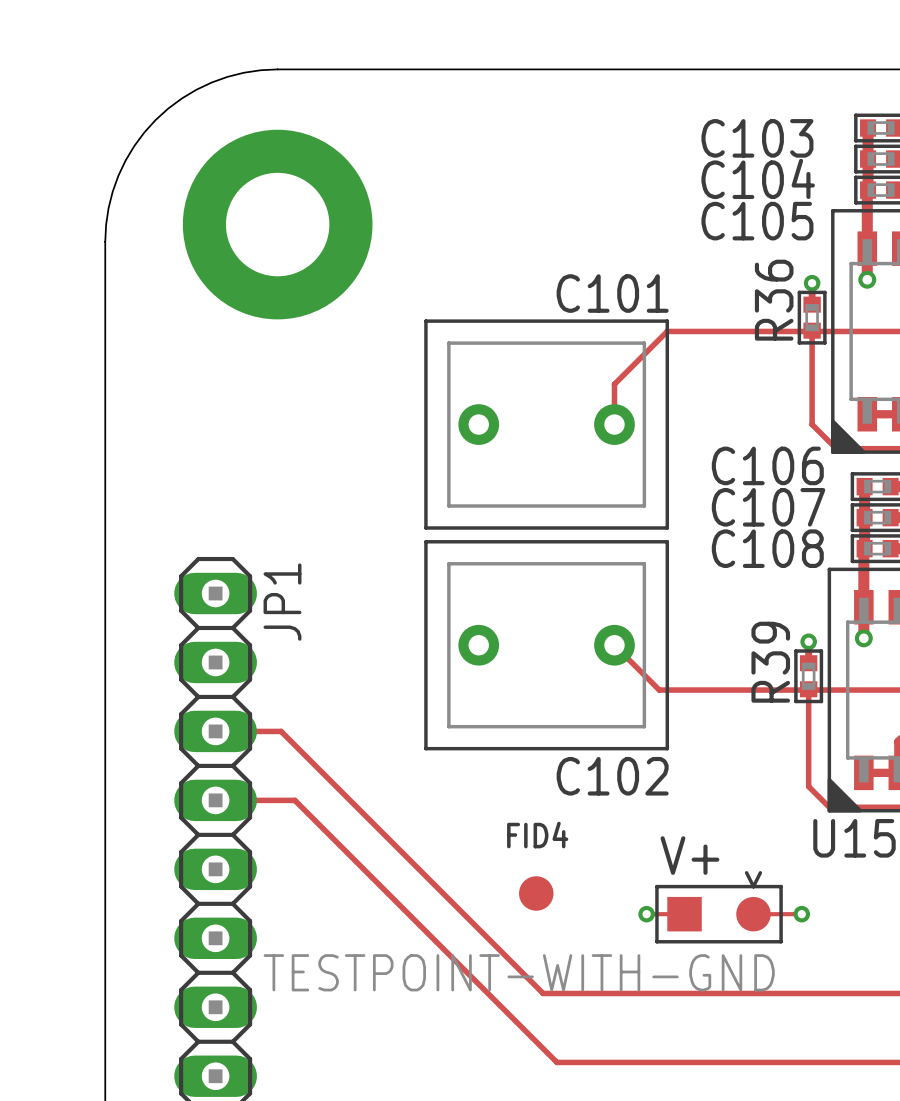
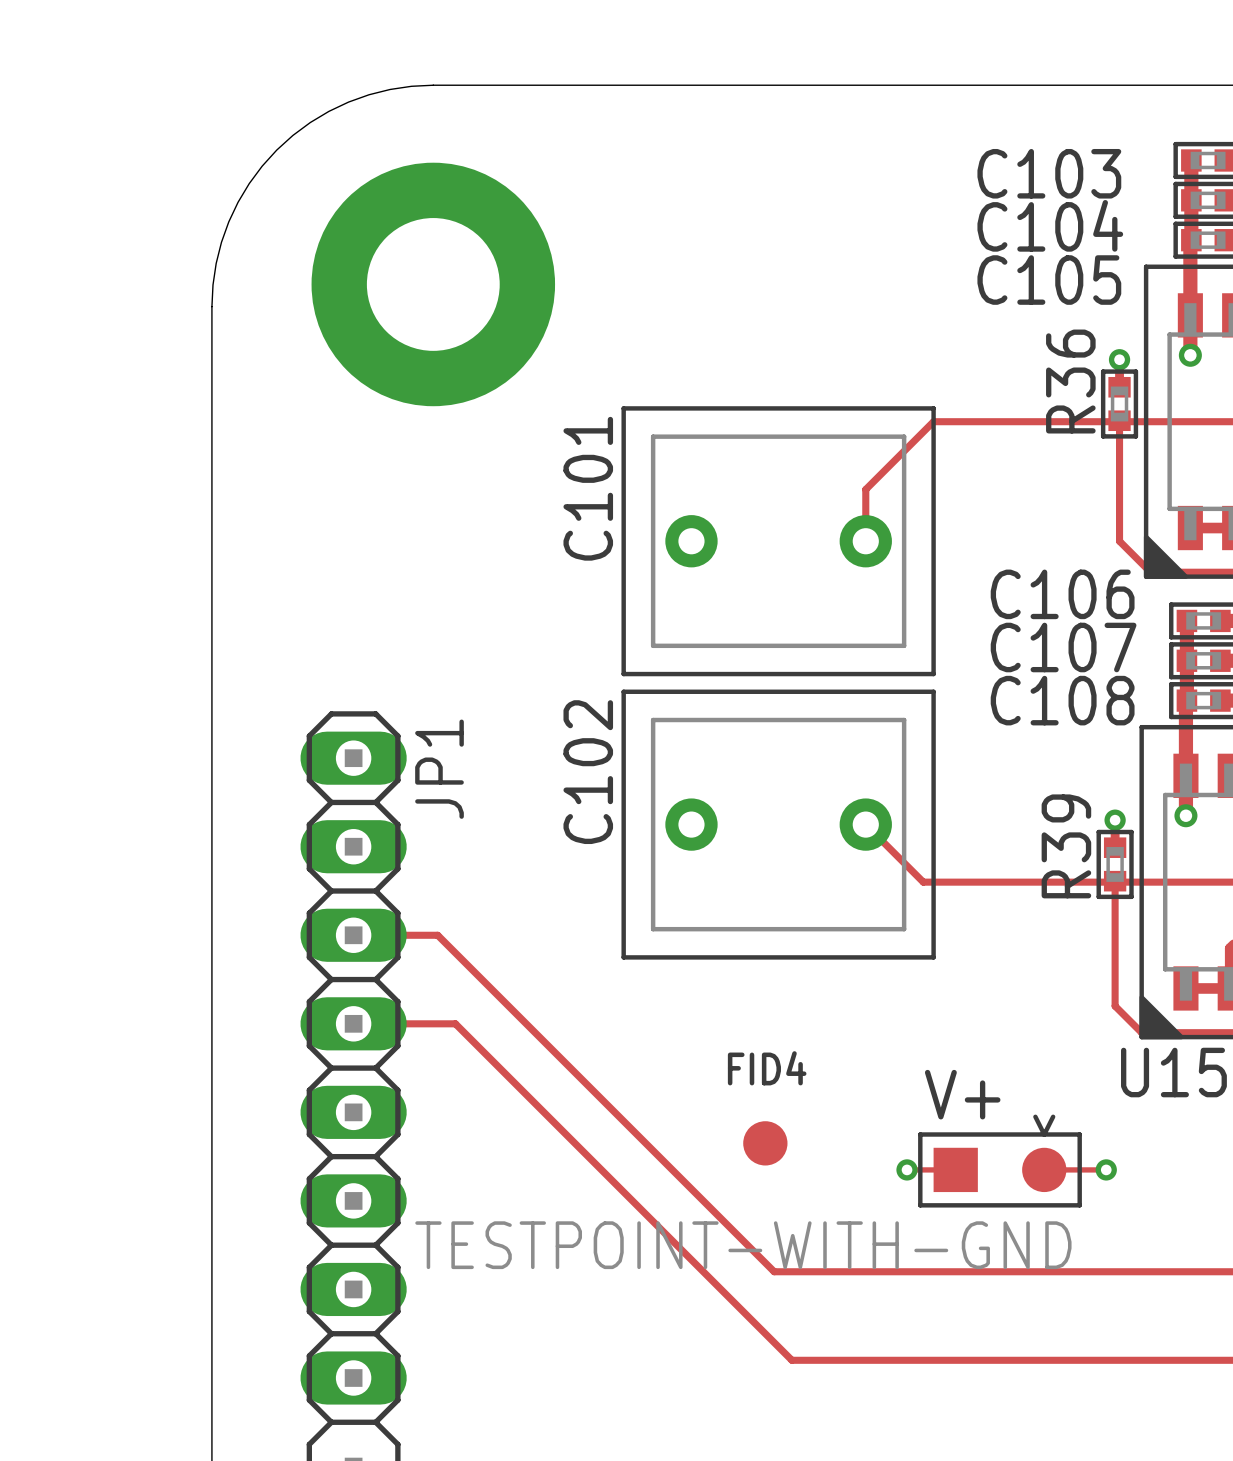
C101 name rotation: 0° (612, 293) -> 90° counterclockwise (588, 488)
C101 name position: C101 (612, 293) -> C101 (588, 488)
C102 name rotation: 0° (612, 776) -> 90° counterclockwise (588, 772)
C102 name position: C102 (612, 776) -> C102 (588, 772)

